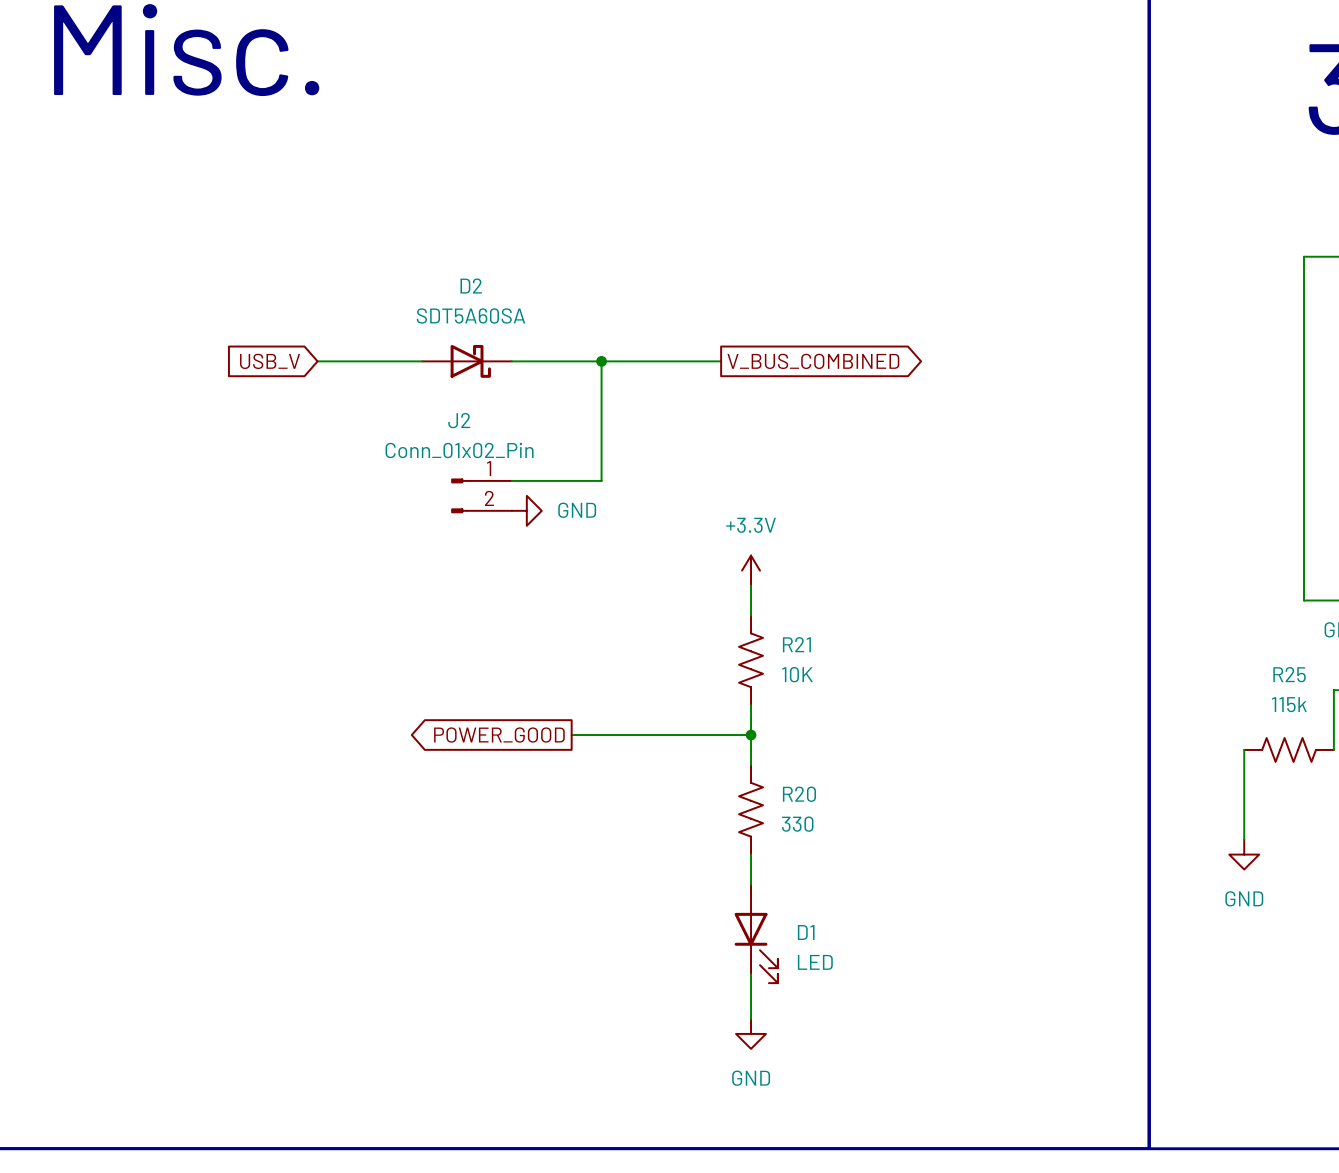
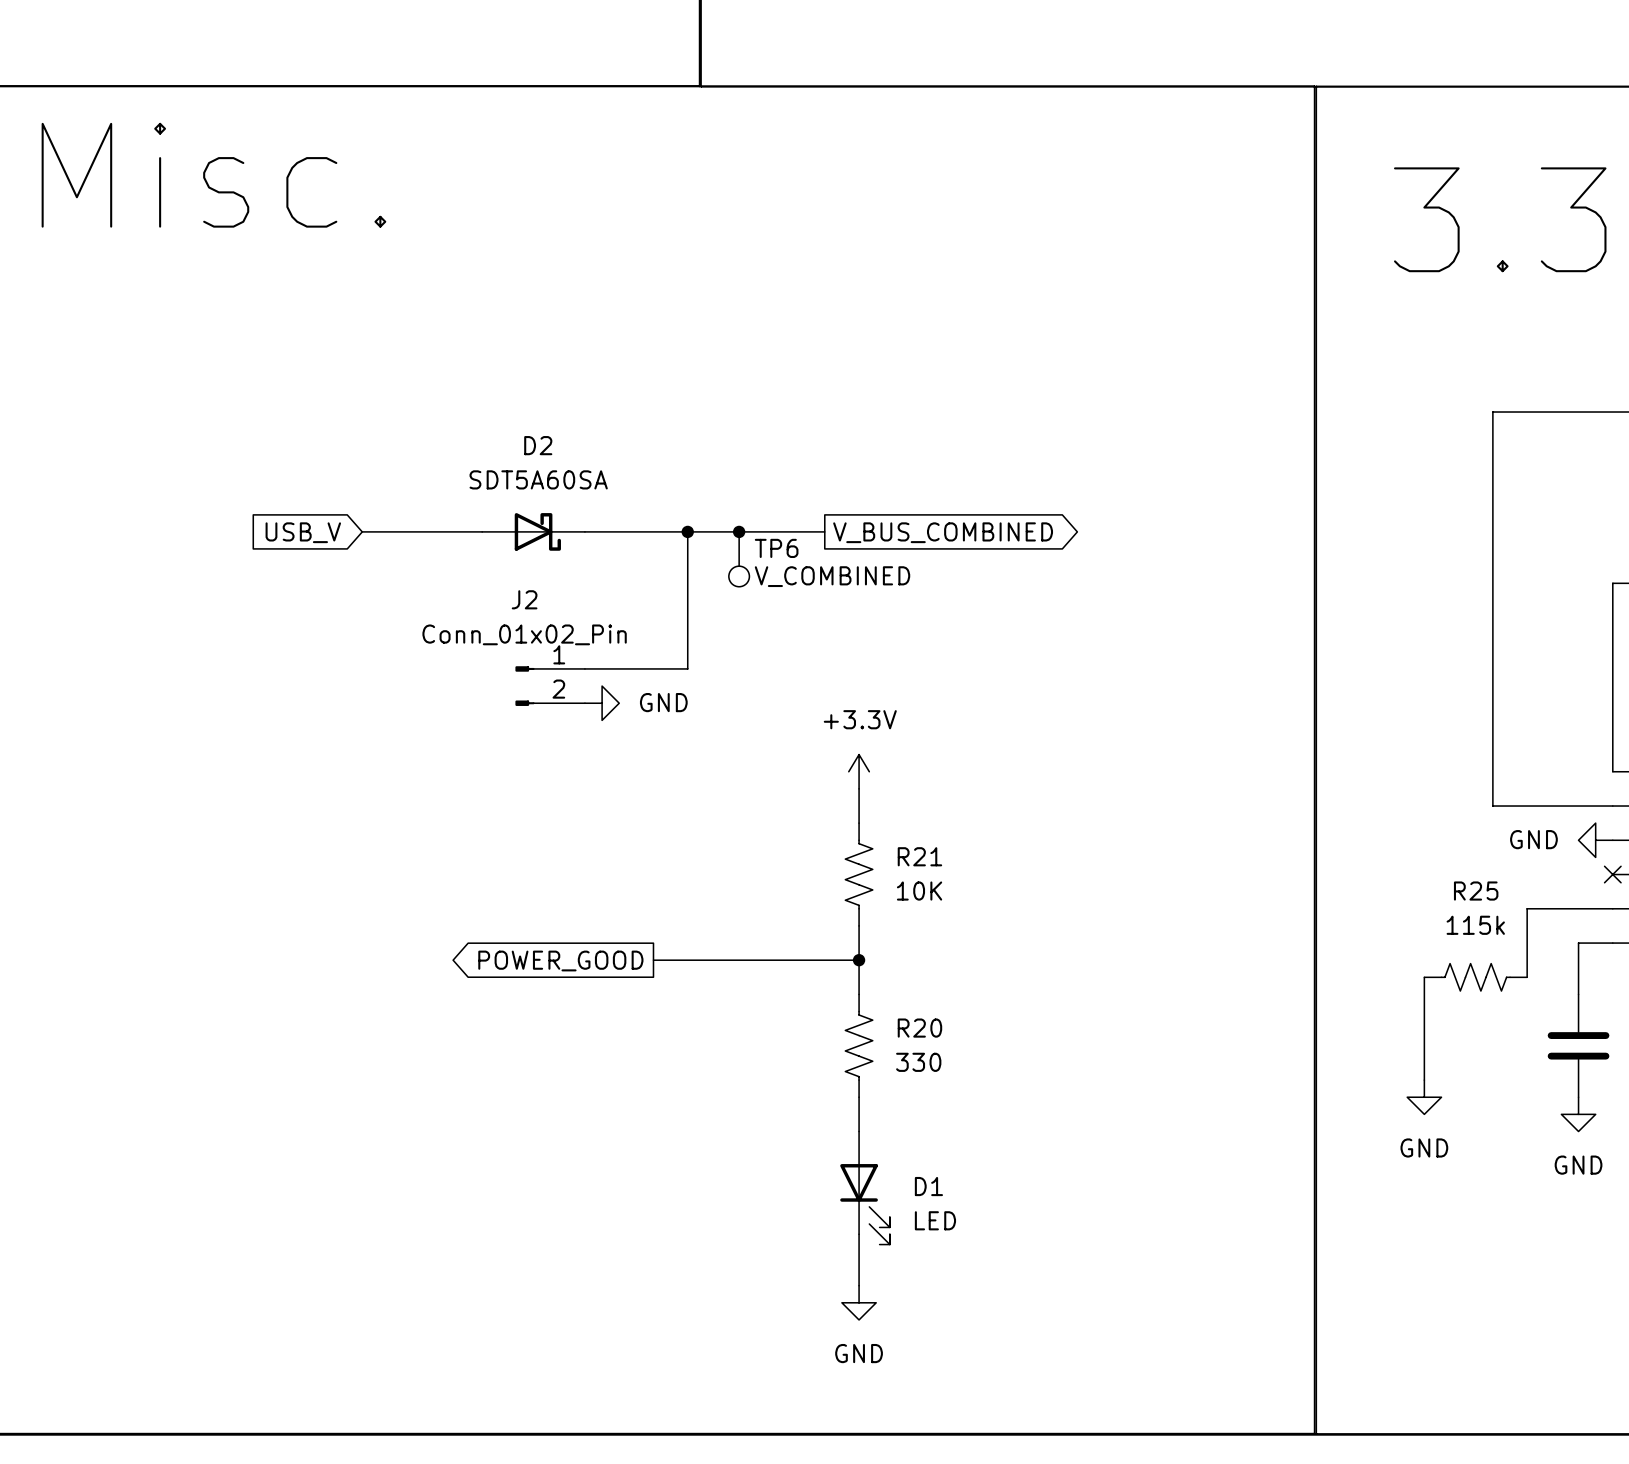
junction: none -> (739, 531)
TP6: none -> V_COMBINED (739, 559)

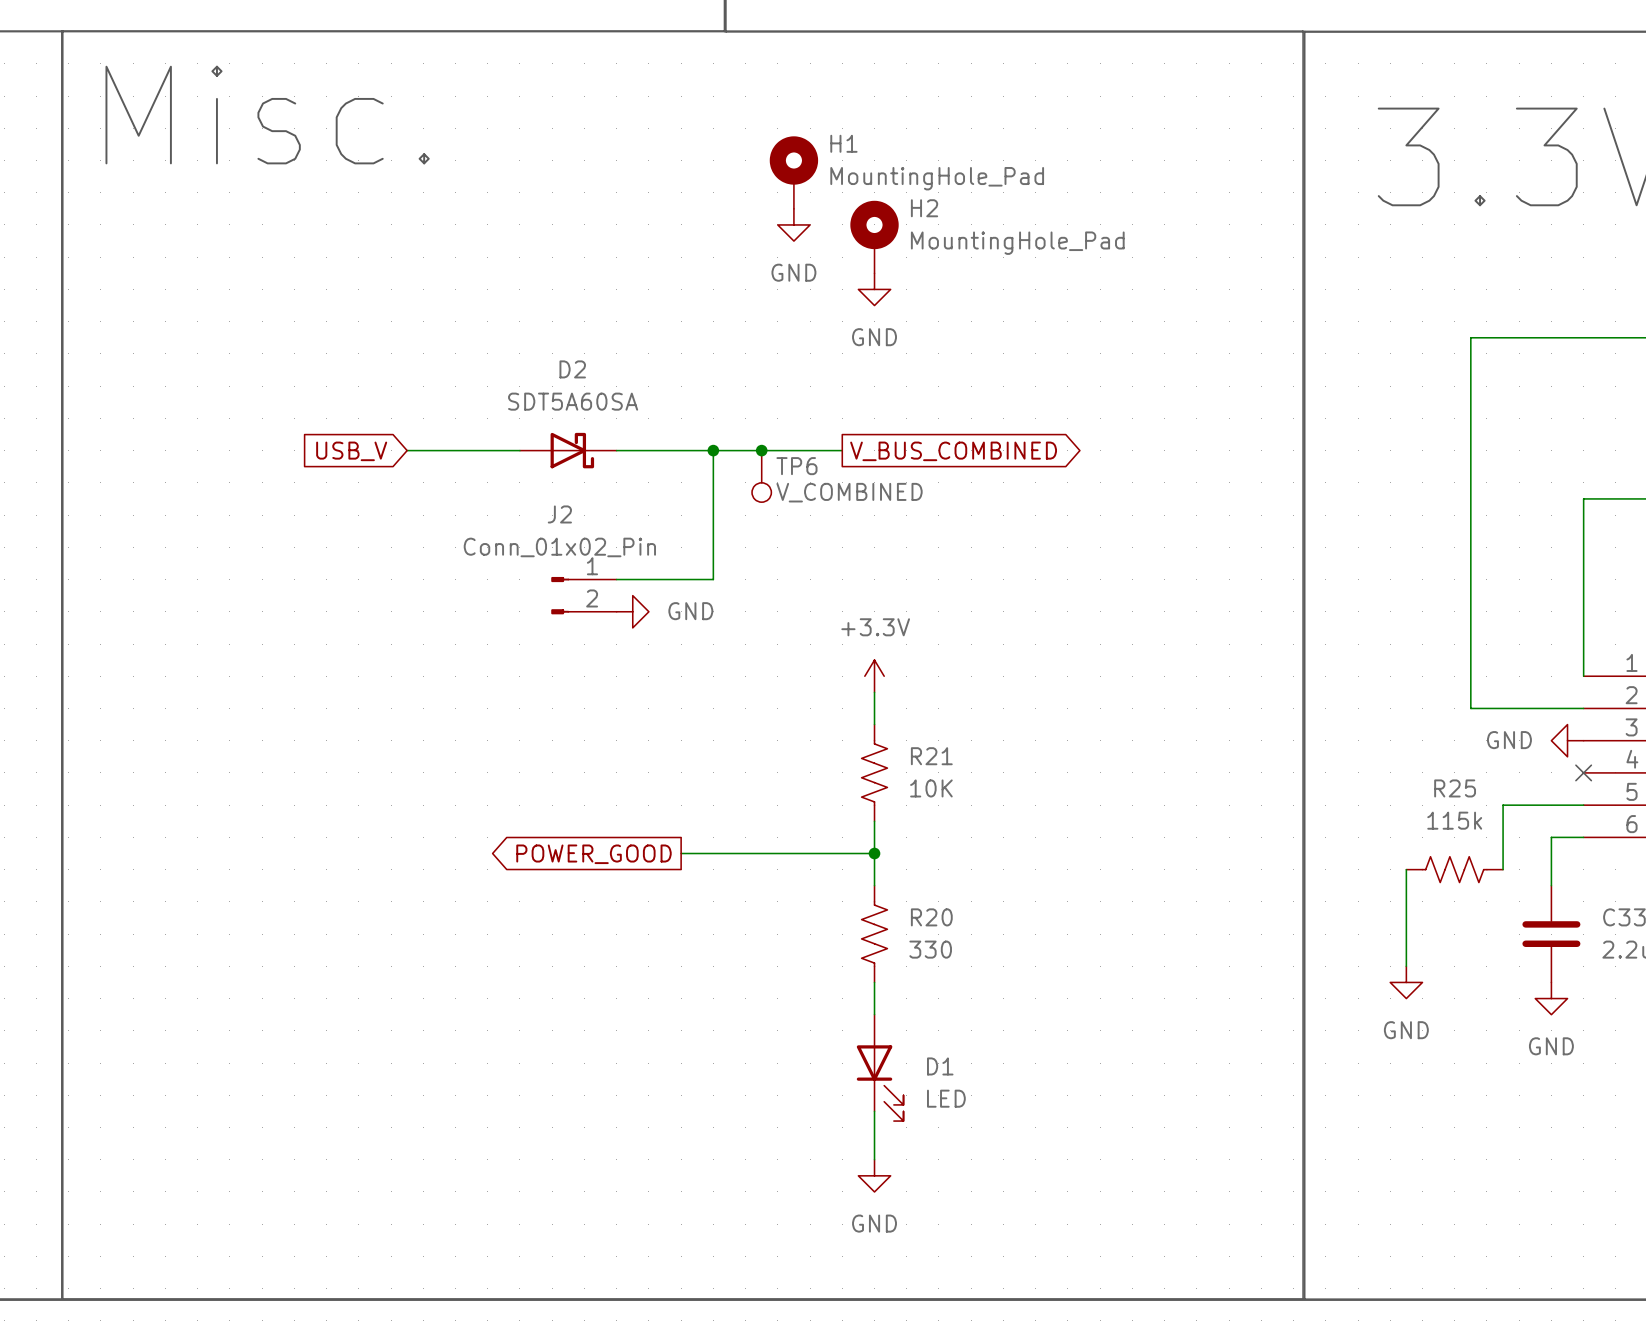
H1: none -> MountingHole_Pad (793, 172)
power symbol: none -> GND (793, 224)
H2: none -> MountingHole_Pad (874, 237)
power symbol: none -> GND (874, 289)

